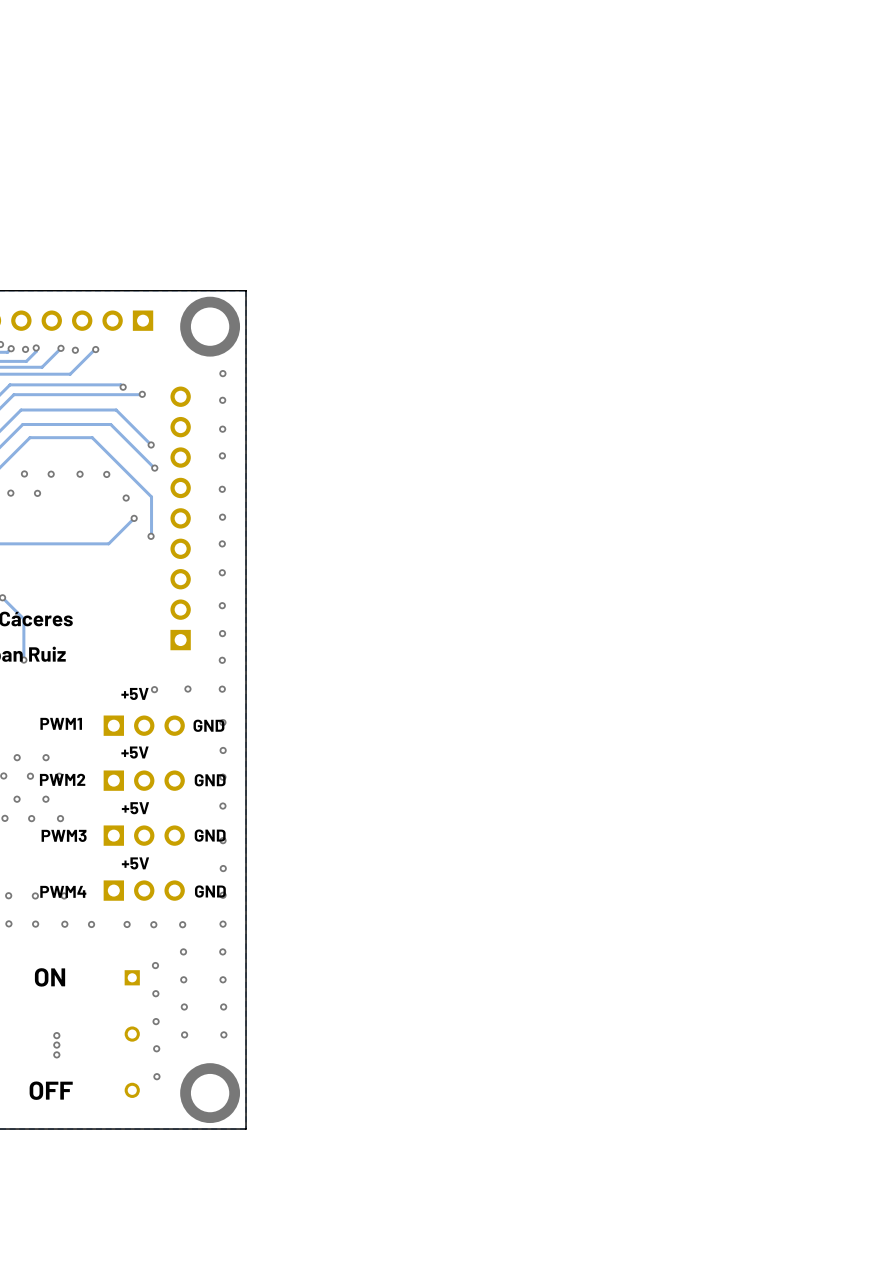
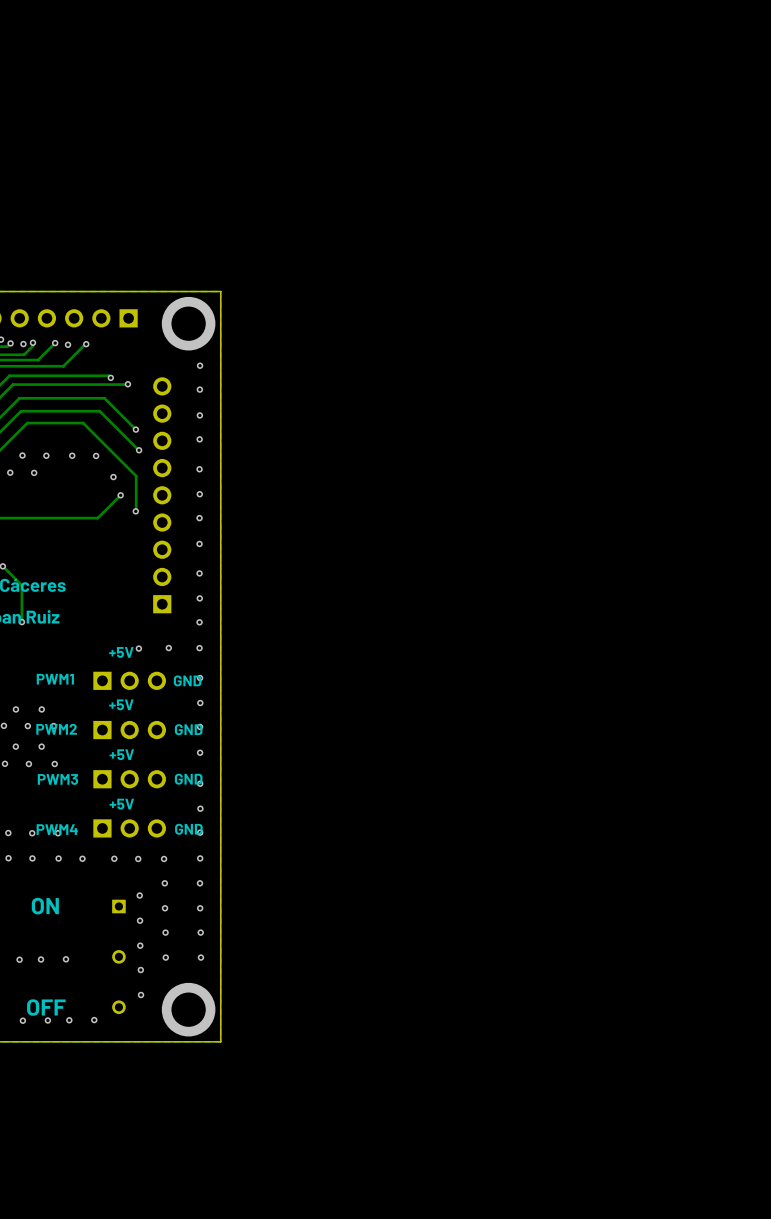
via: (56, 1035) -> none
via: none -> (65, 959)
via: none -> (19, 959)
via: none -> (41, 959)
via: (56, 1045) -> none
via: (56, 1054) -> none
via: none -> (69, 1020)
via: none -> (94, 1020)
via: none -> (22, 1020)
via: none -> (47, 1020)

